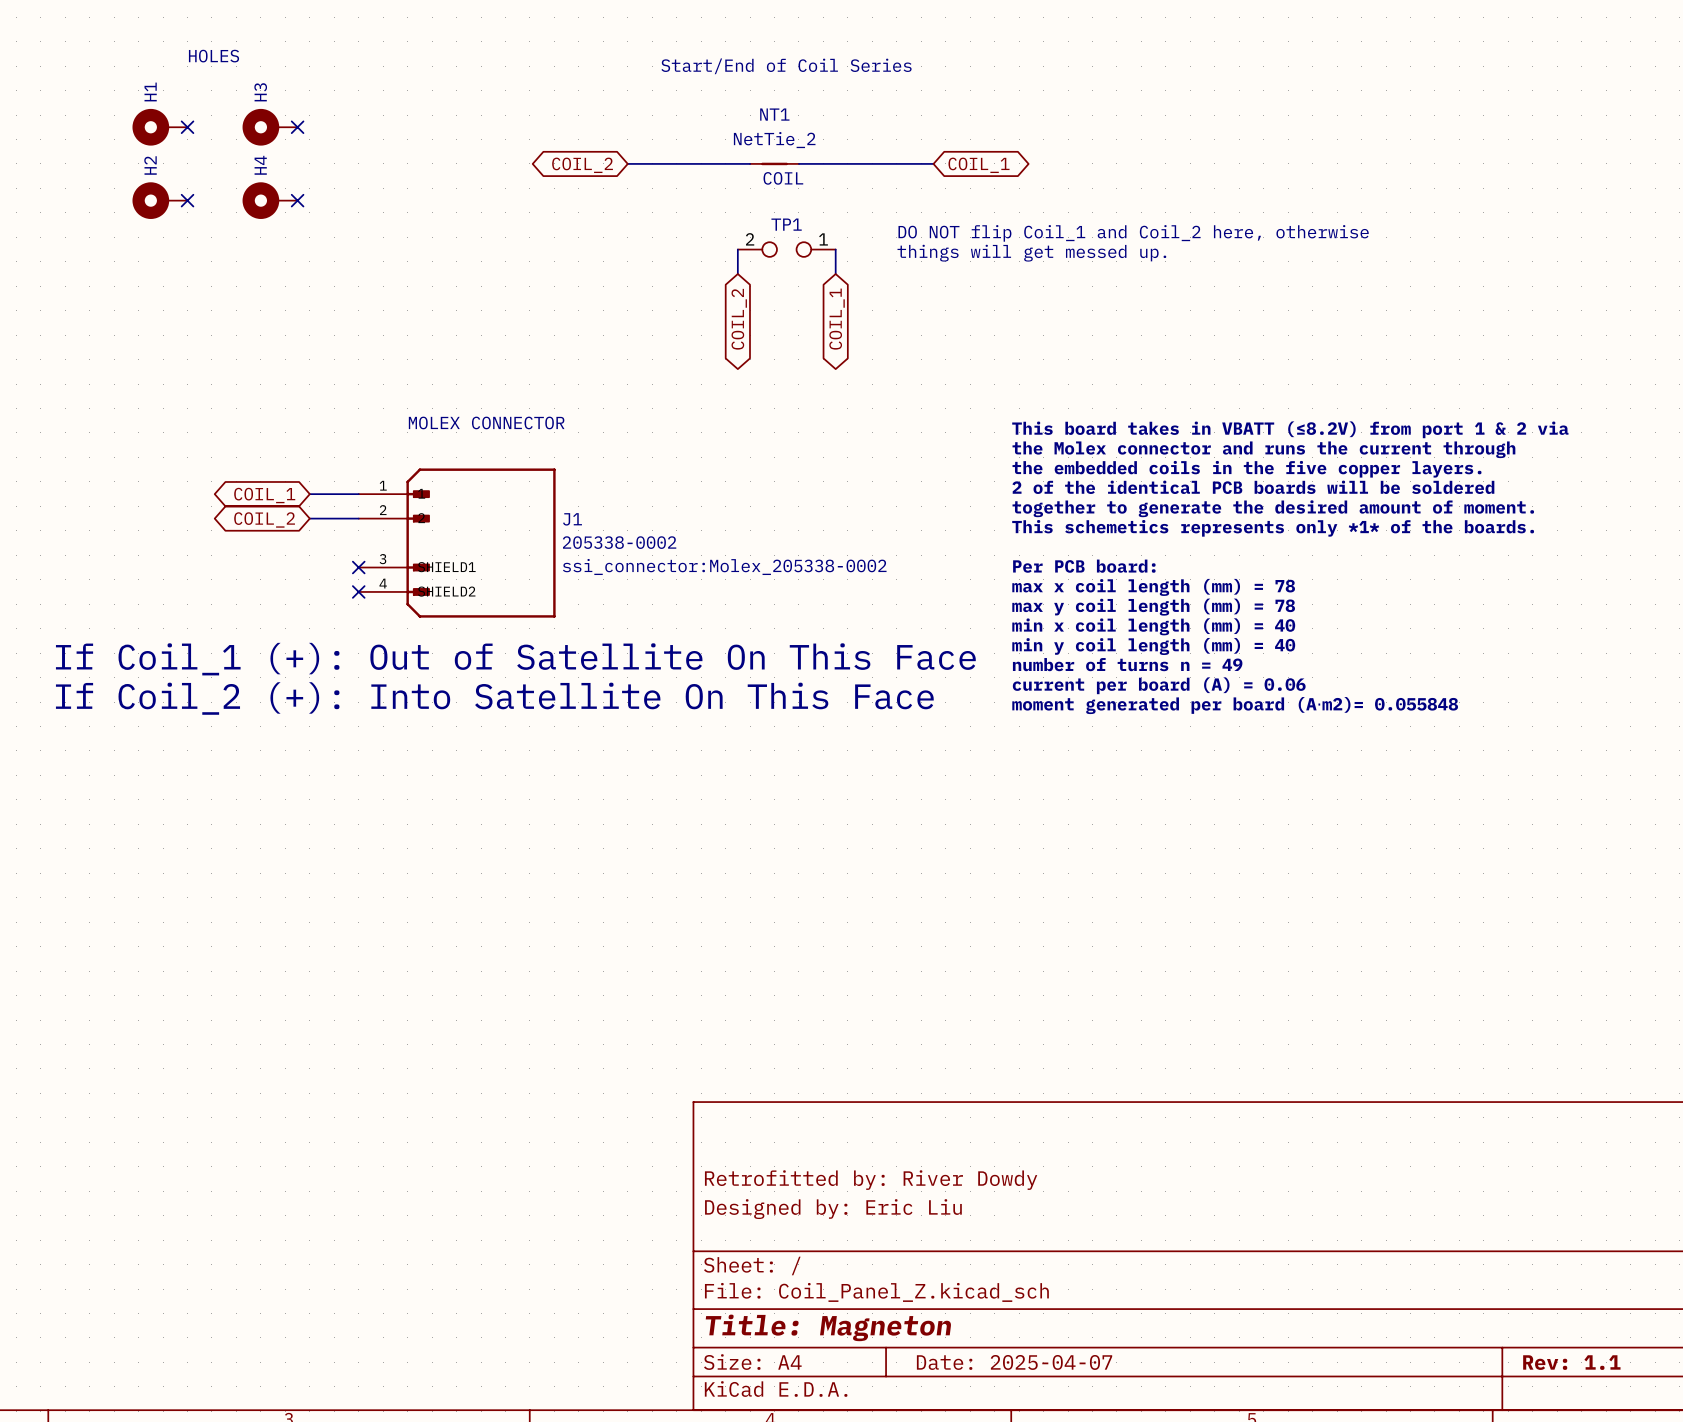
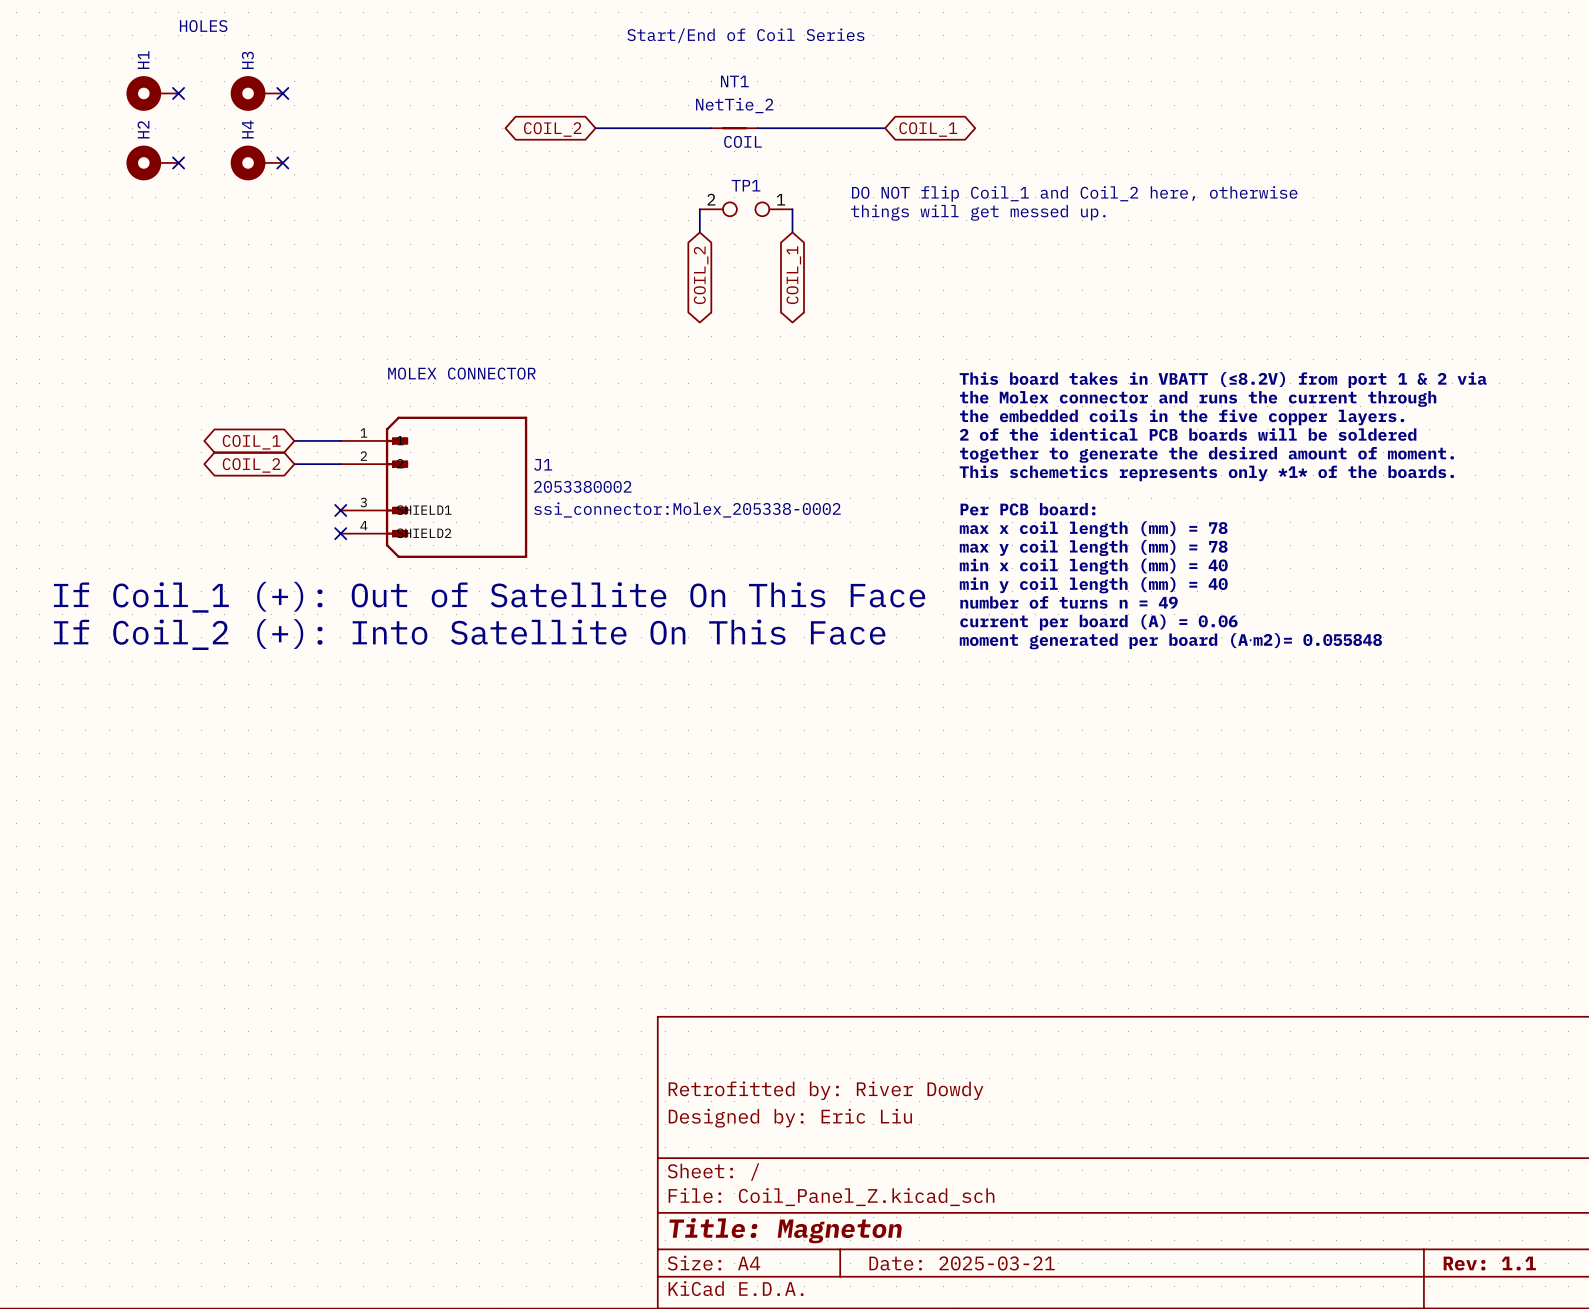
J1 value: 205338-0002 (619, 542) -> 2053380002 (582, 486)
title block: Date: 2025-04-07 (1014, 1362) -> Date: 2025-03-21 (962, 1263)

